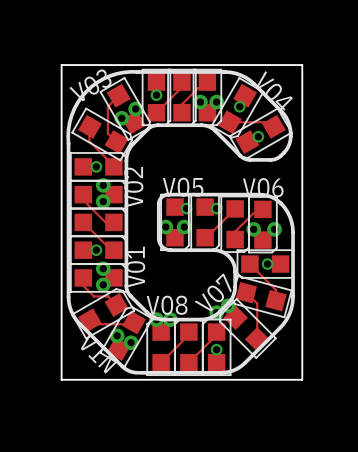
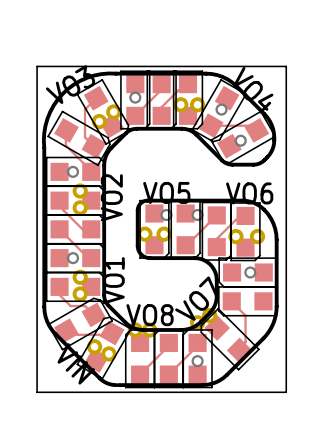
track: (249, 264) (275, 290) (275, 300) -> none
track: none -> (231, 301) (245, 315) (245, 342) (239, 348)
track: (246, 292) (257, 303) (257, 339) -> none
part rotation: 0° (261, 296) -> 15° counterclockwise (247, 301)

